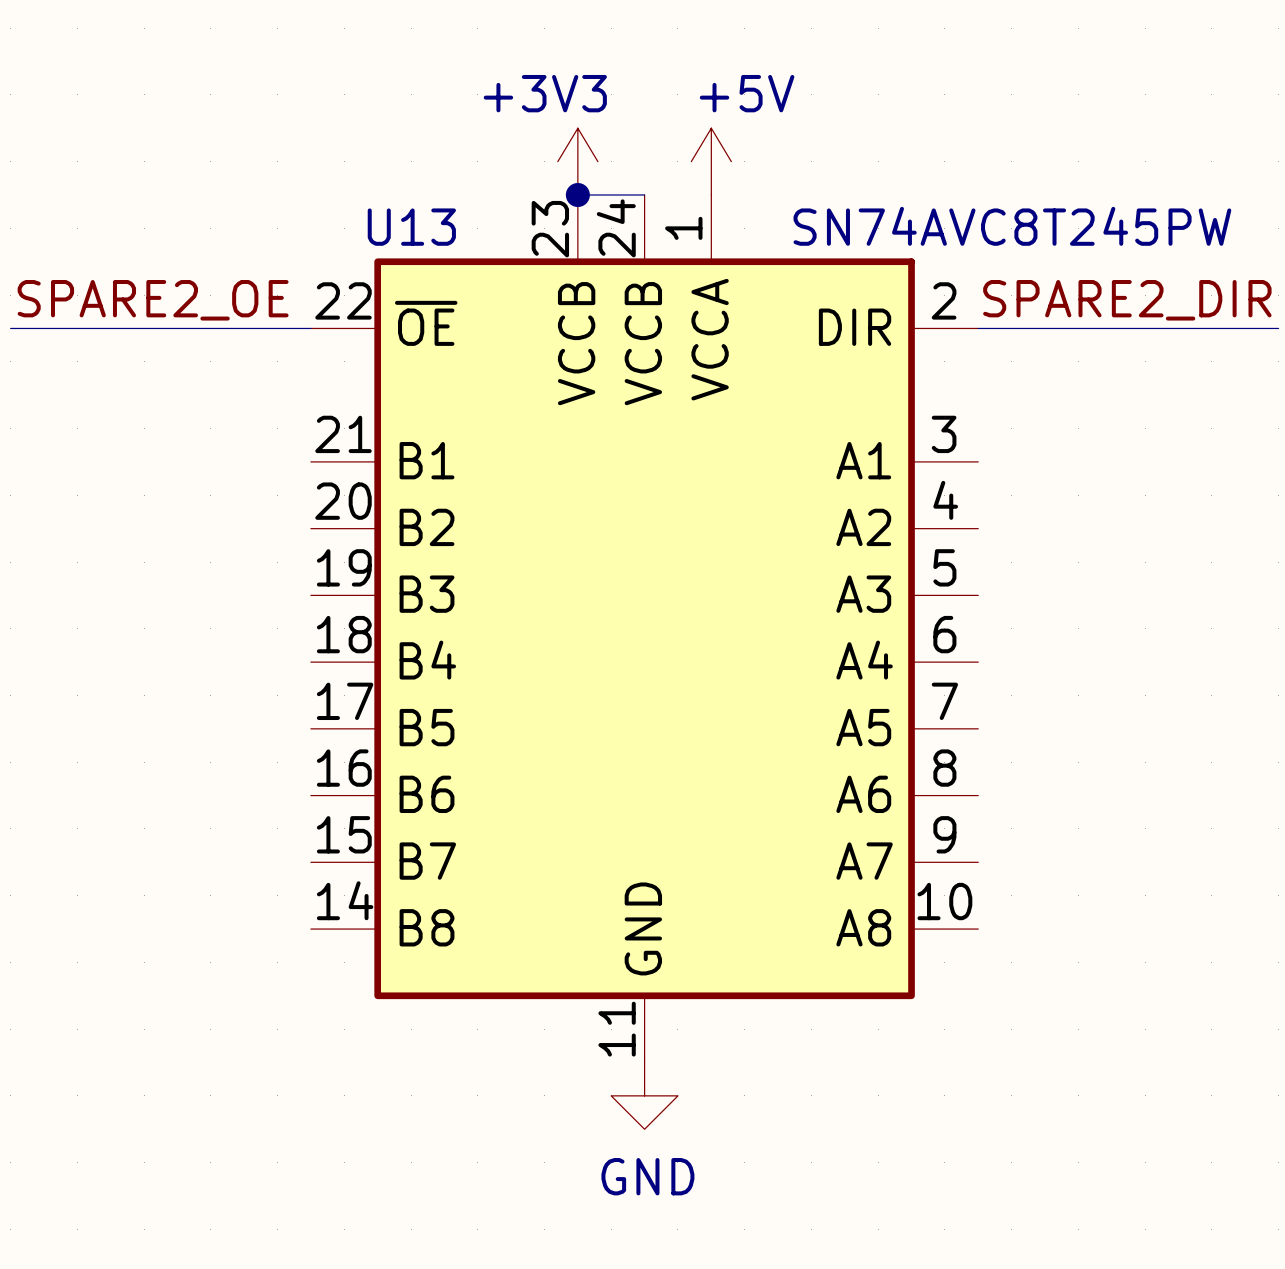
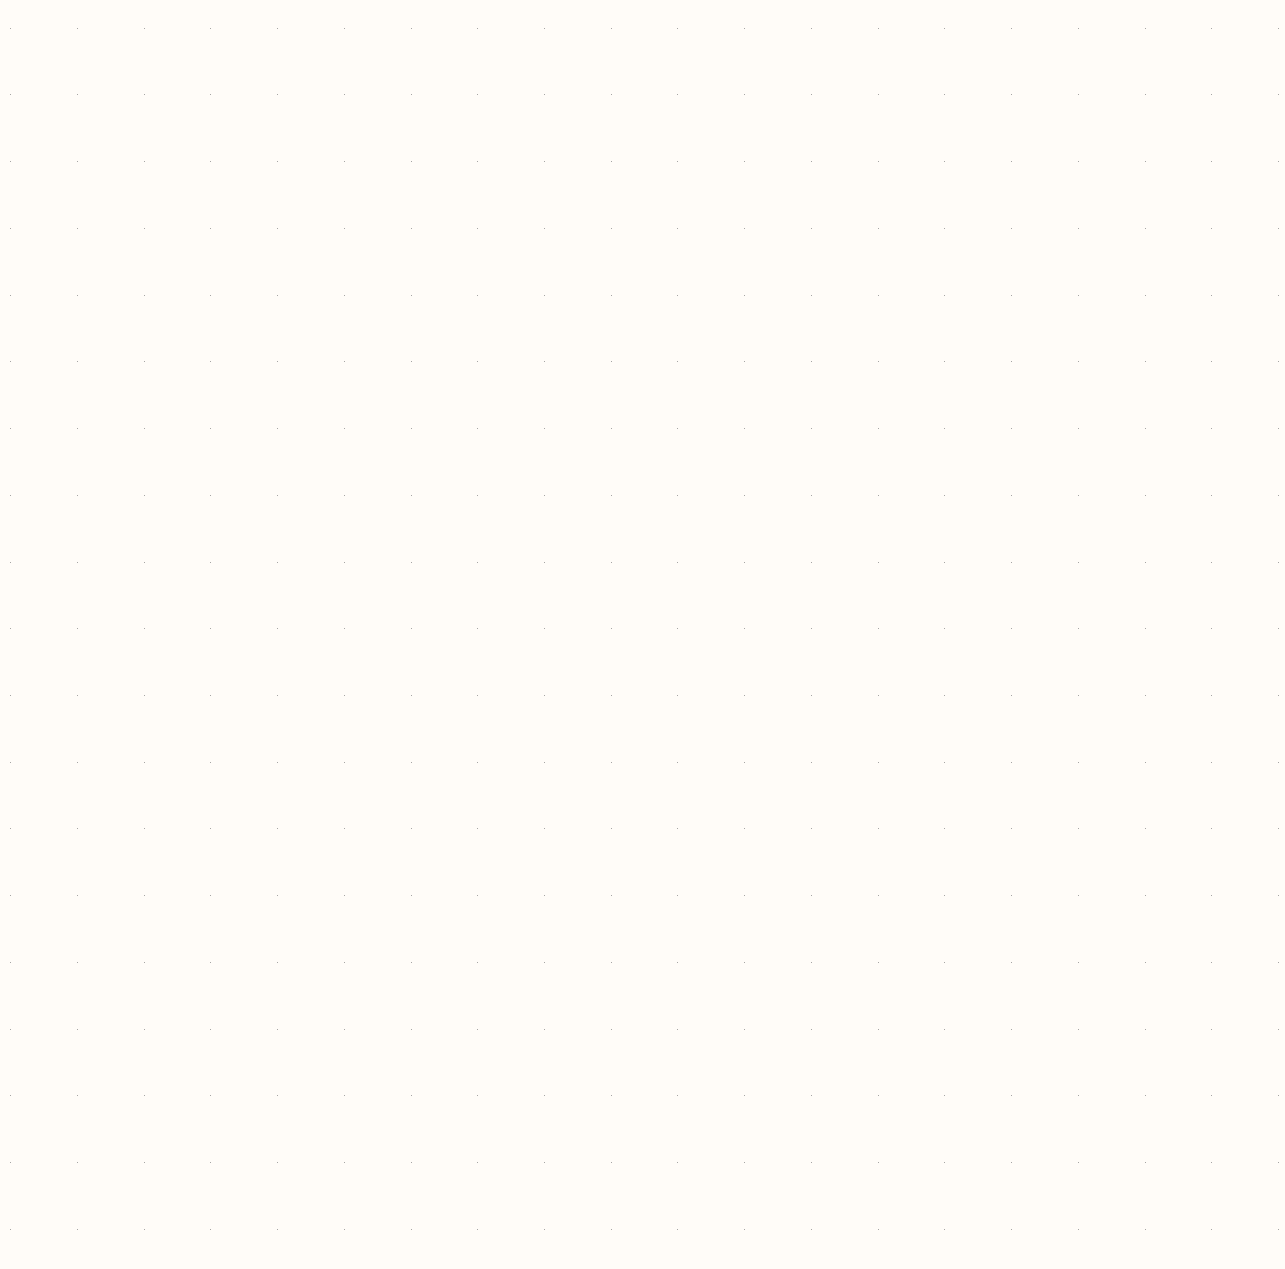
power symbol: +3V3 (577, 161) -> none
power symbol: +5V (711, 161) -> none
wire: (577, 194) (644, 194) -> none
junction: (577, 194) -> none
label: SPARE2_OE (153, 300) -> none
label: SPARE2_DIR (1127, 300) -> none
wire: (10, 328) (310, 328) -> none
wire: (978, 328) (1278, 328) -> none
U13: SN74AVC8T245PW (644, 628) -> none
power symbol: GND (644, 1095) -> none

